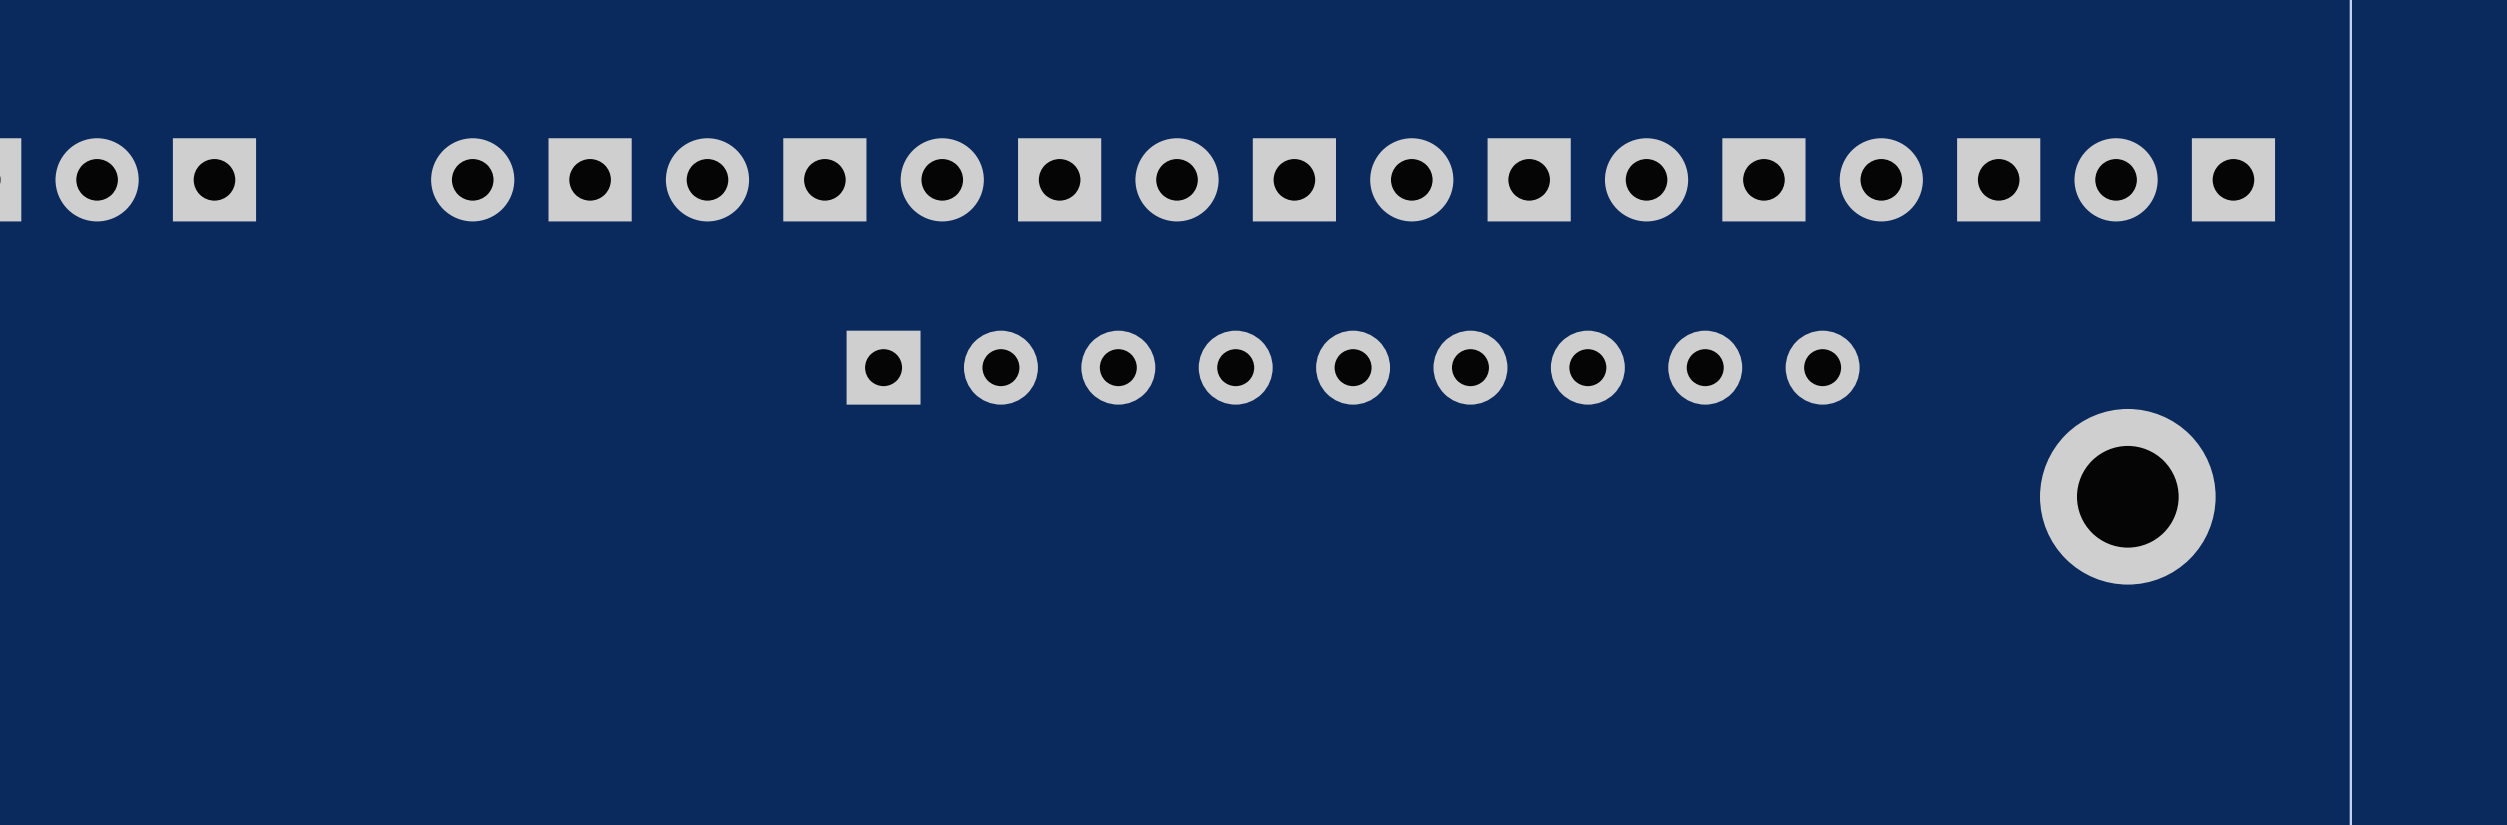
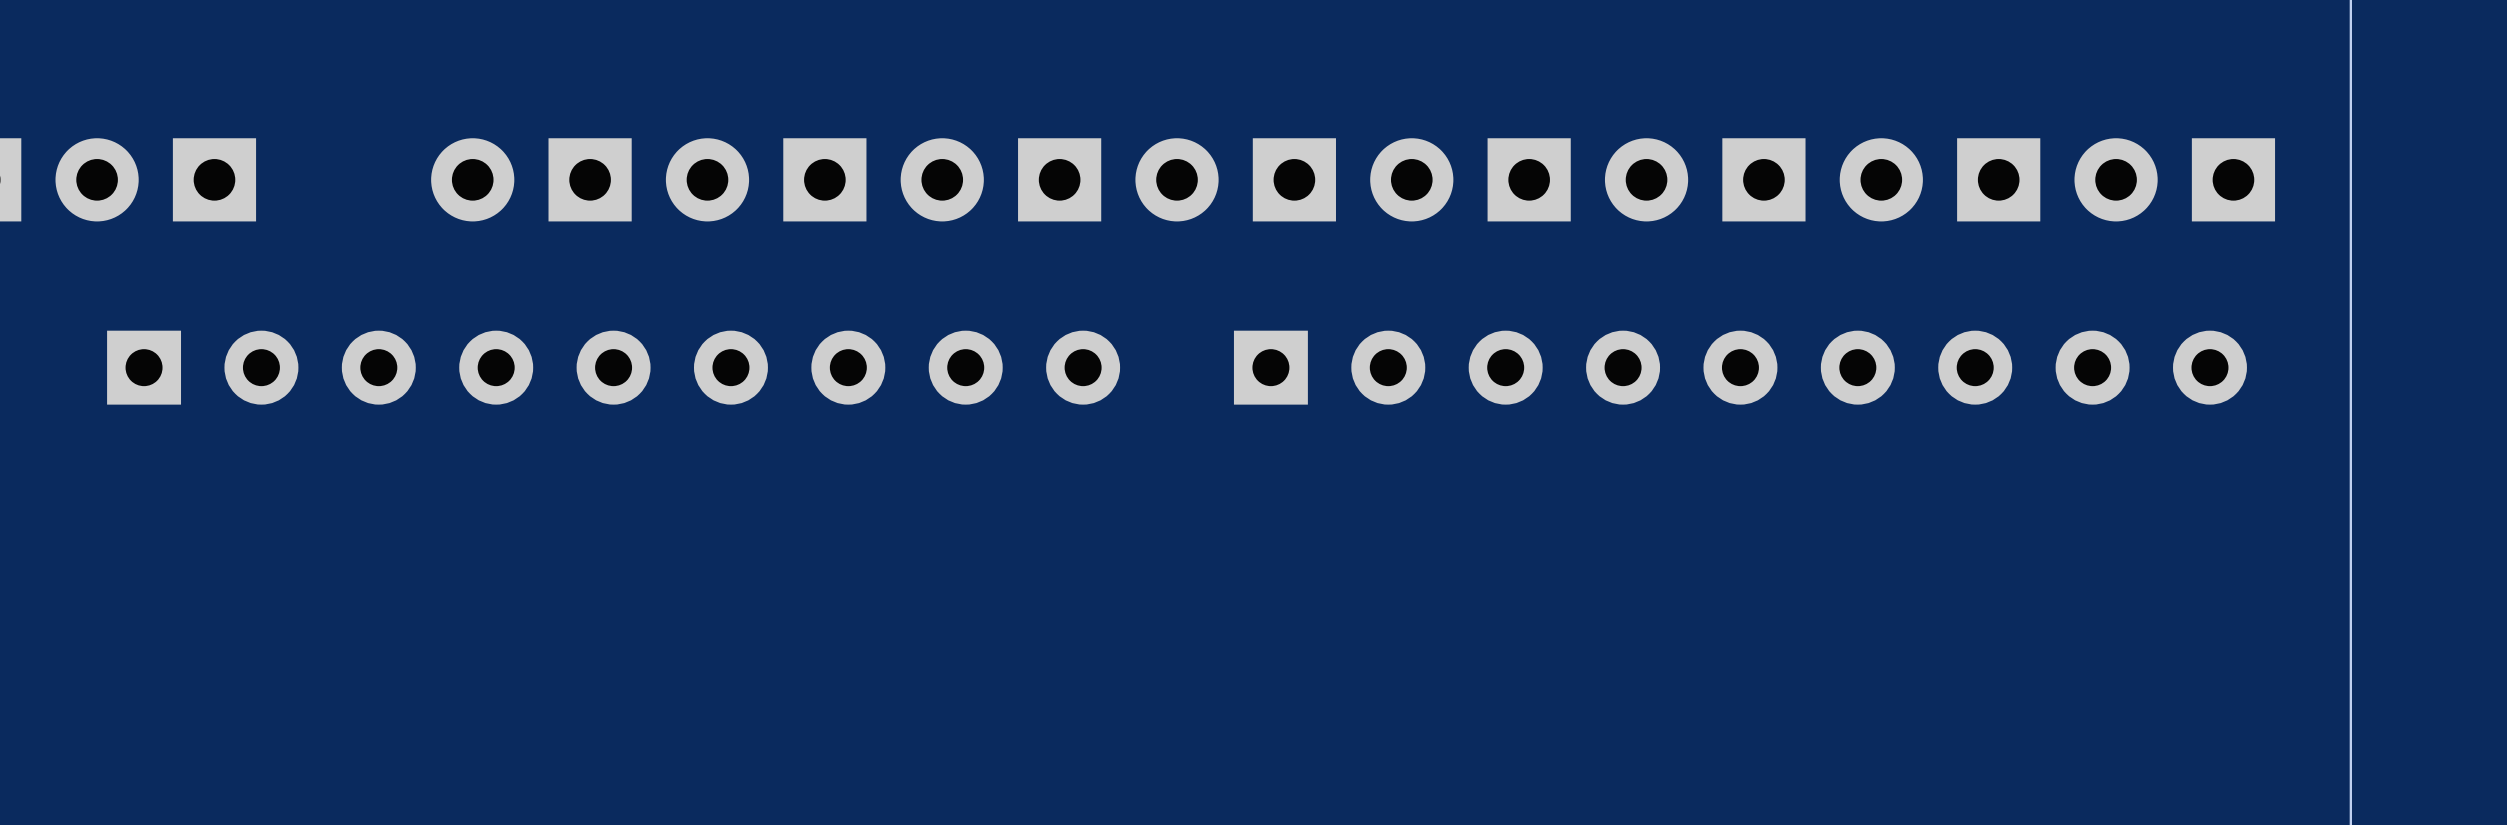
part: none -> (613, 367)
part: (1353, 367) -> none
part: none -> (1740, 367)
part: (2127, 496) -> none

